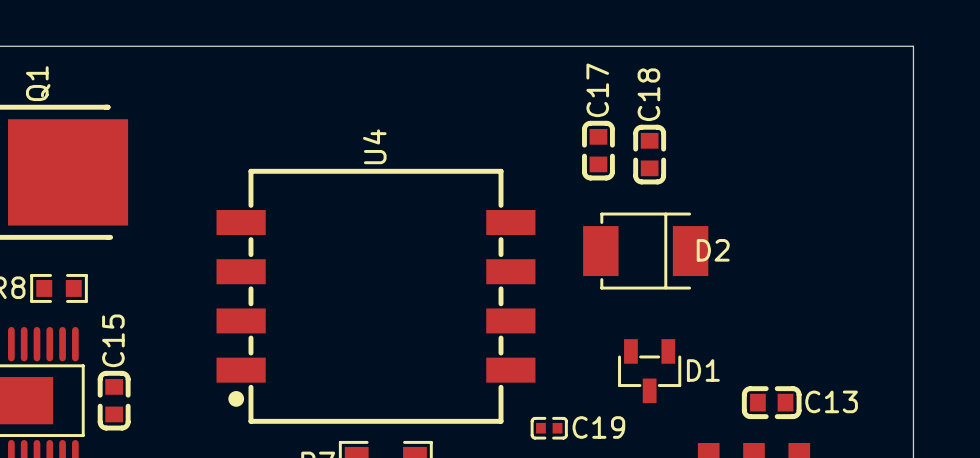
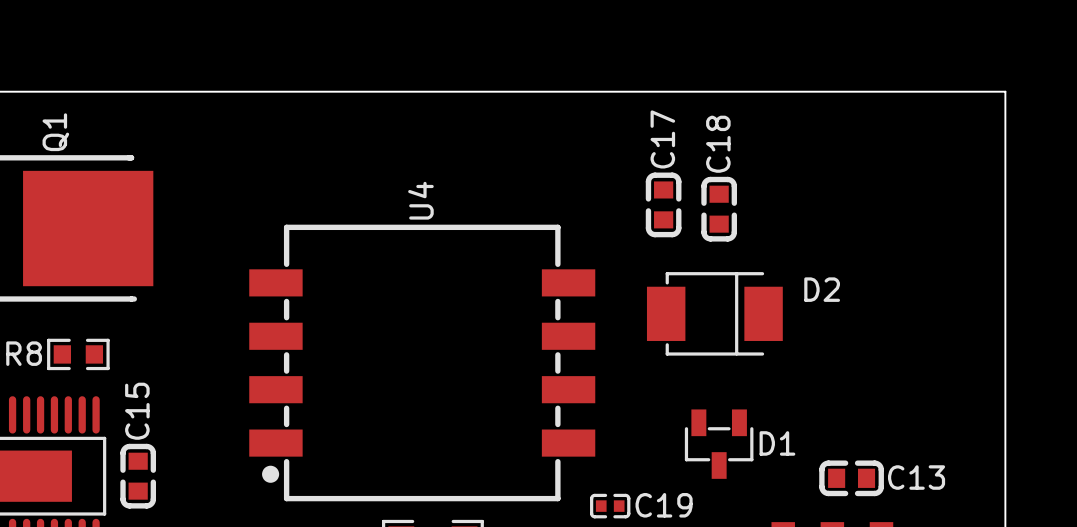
D2 name position: D2 (713, 250) -> D2 (822, 289)

